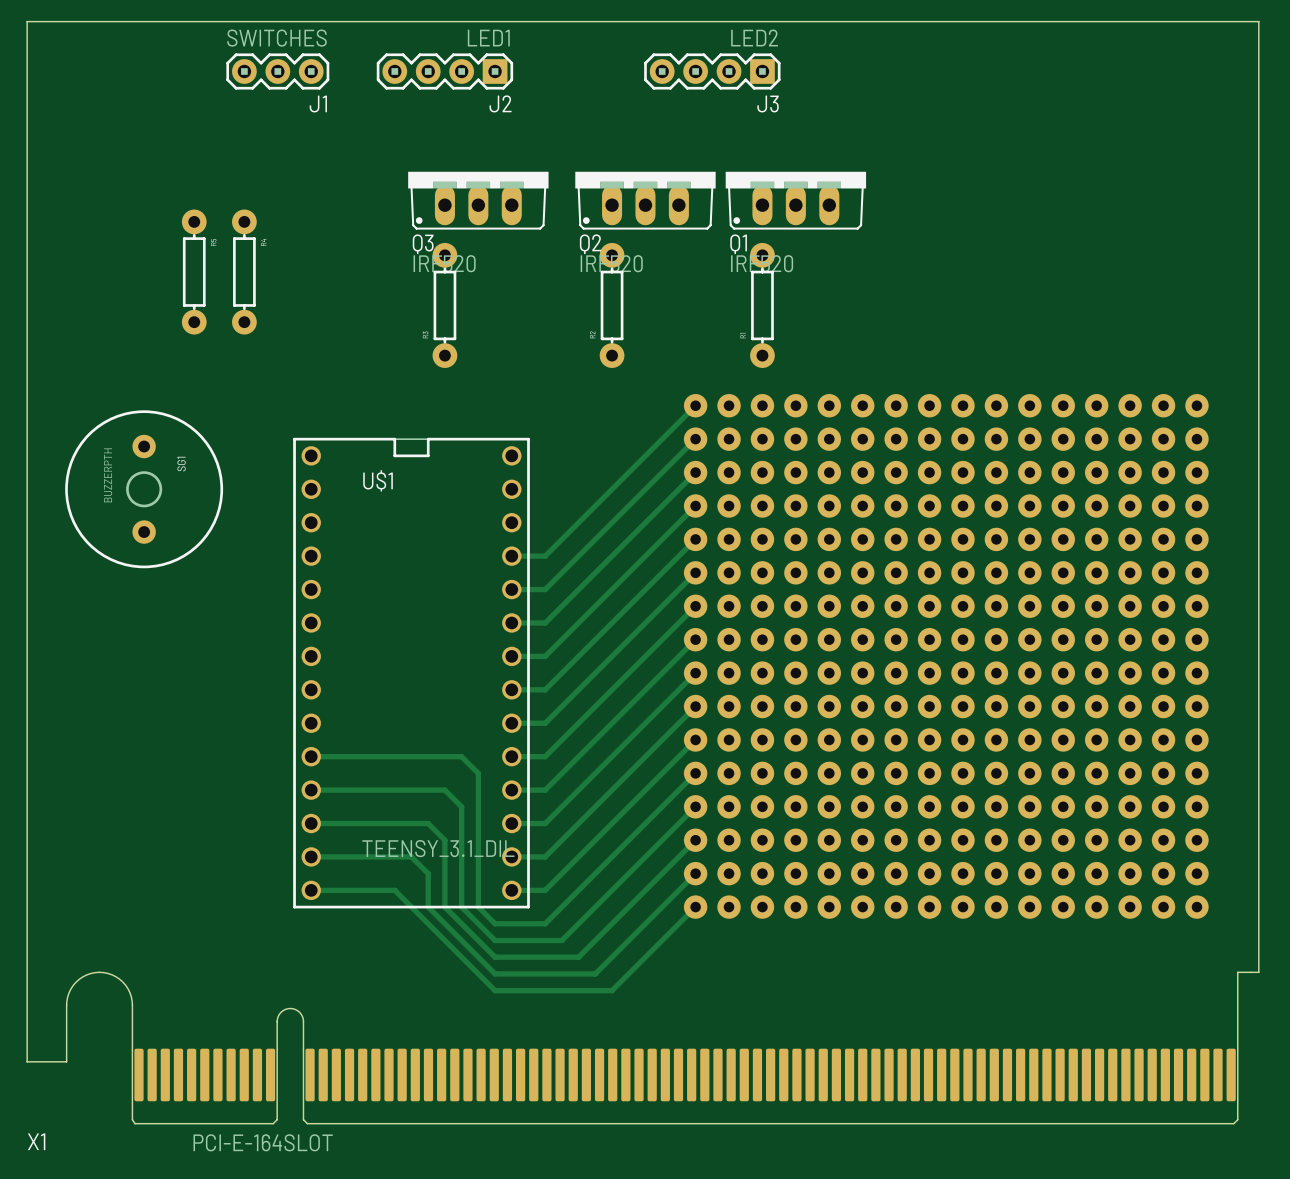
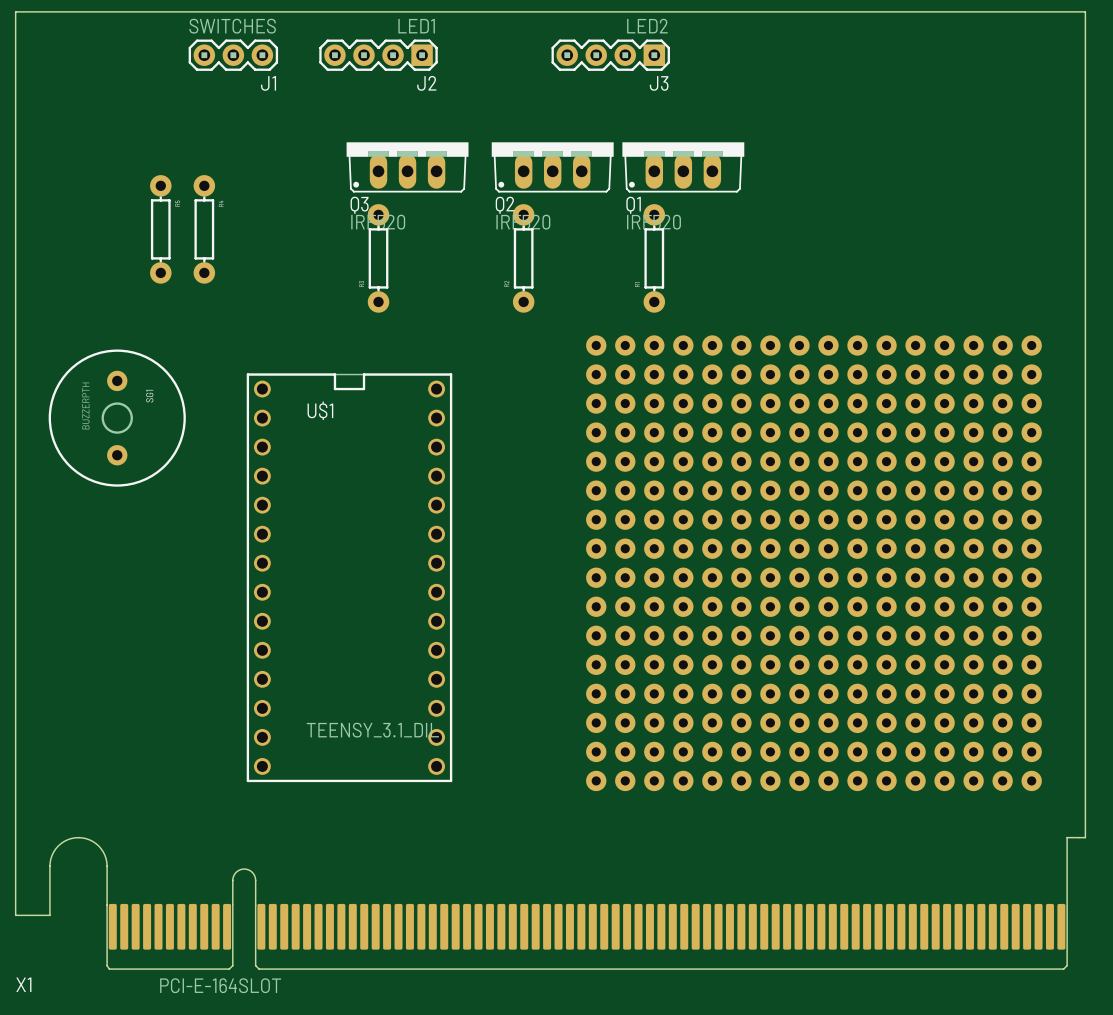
track: (695, 405) (545, 556) (511, 556) -> none
track: (695, 439) (545, 589) (511, 589) -> none
track: (695, 472) (545, 622) (511, 622) -> none
track: (695, 506) (545, 656) (511, 656) -> none
track: (695, 539) (545, 689) (511, 689) -> none
track: (695, 572) (545, 723) (511, 723) -> none
track: (695, 606) (545, 756) (511, 756) -> none
track: (695, 639) (545, 790) (511, 790) -> none
track: (695, 673) (545, 823) (511, 823) -> none
track: (695, 706) (545, 856) (511, 856) -> none
track: (695, 739) (545, 890) (511, 890) -> none
track: (311, 756) (461, 756) (478, 773) (478, 907) (495, 923) (545, 923) (695, 773) -> none
track: (311, 790) (444, 790) (461, 806) (461, 907) (495, 940) (561, 940) (695, 806) -> none
track: (311, 823) (428, 823) (444, 840) (444, 907) (495, 957) (578, 957) (695, 840) -> none
track: (311, 856) (411, 856) (428, 873) (428, 907) (495, 973) (595, 973) (695, 873) -> none
track: (311, 890) (394, 890) (495, 990) (612, 990) (695, 907) -> none

